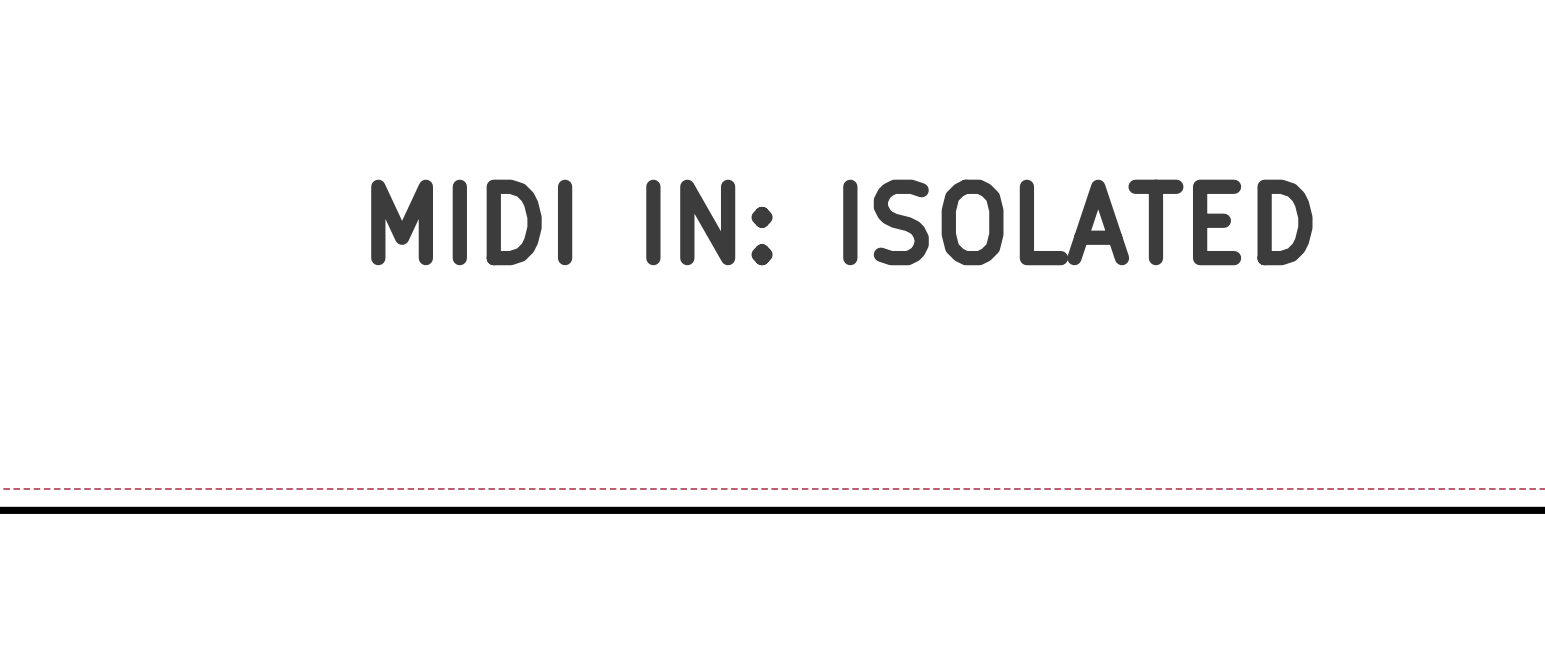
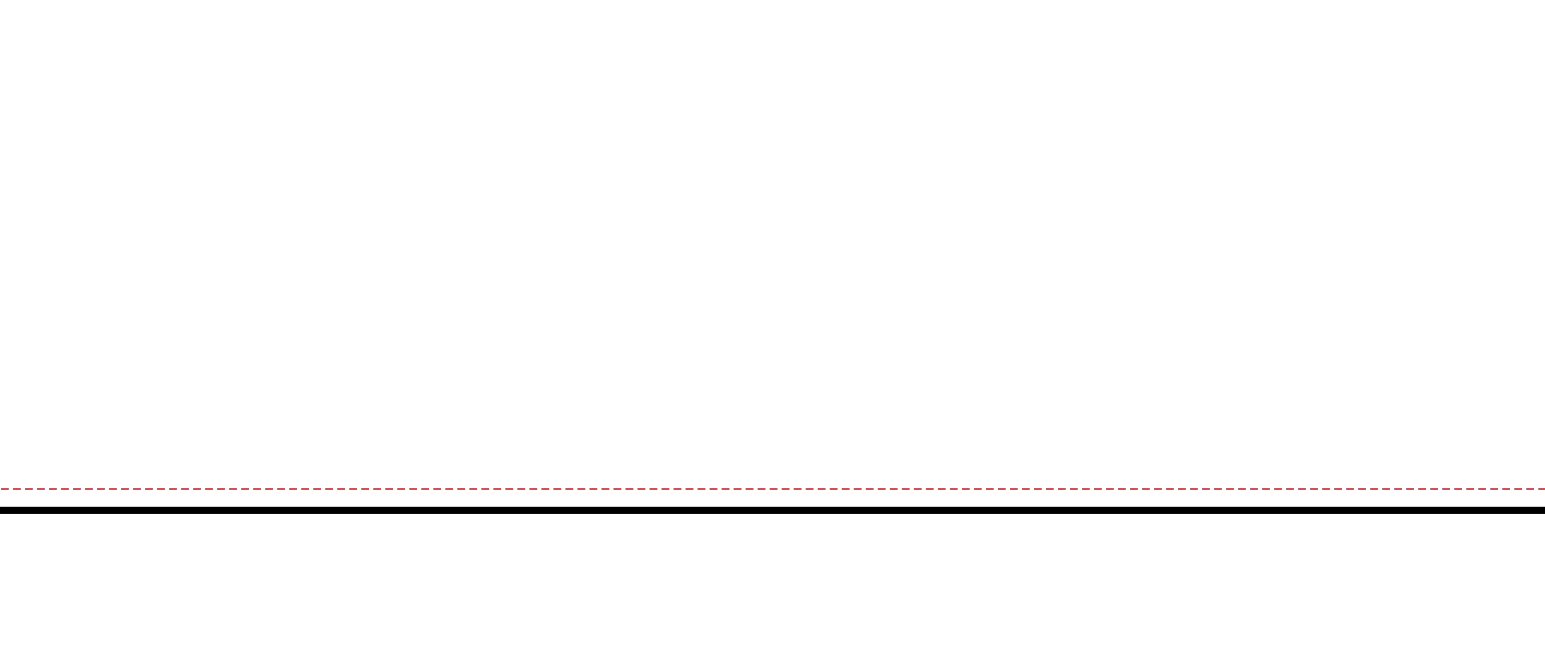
text: MIDI IN: ISOLATED (841, 222) -> none

